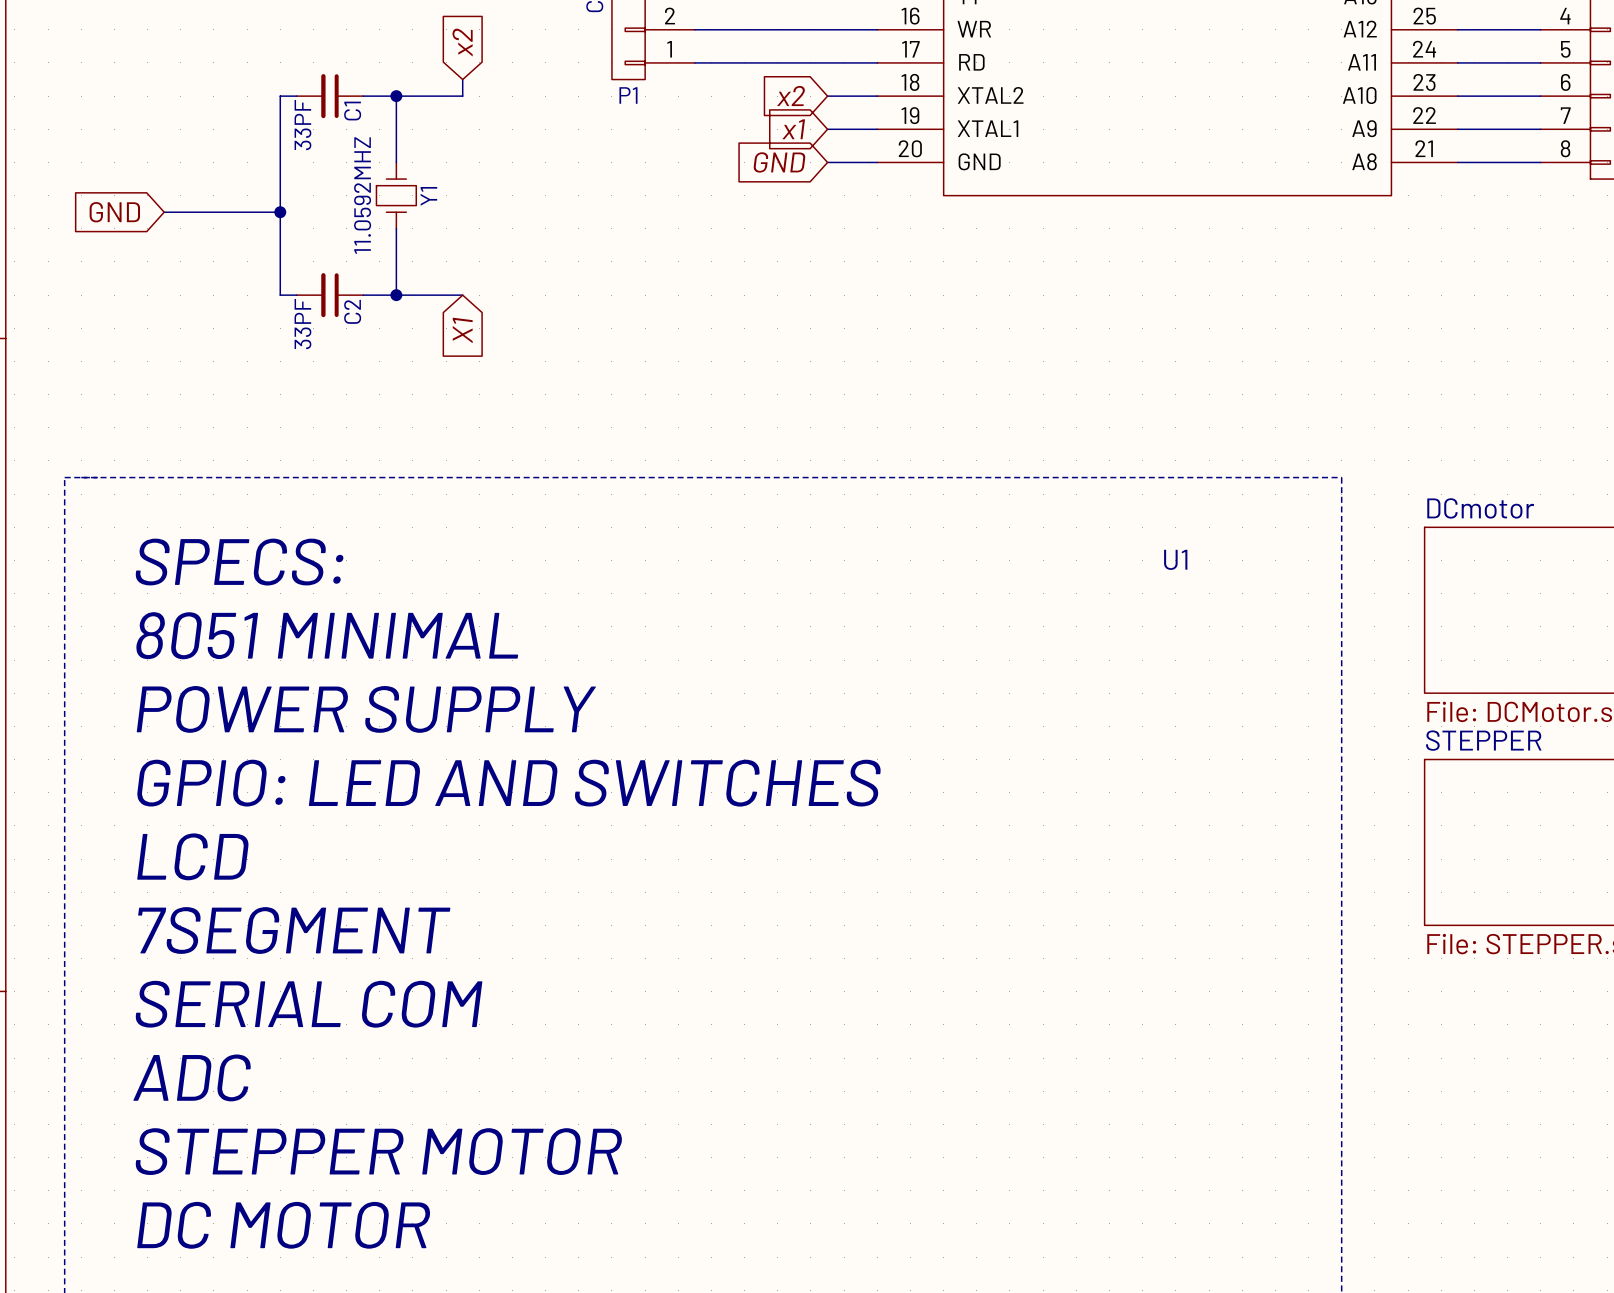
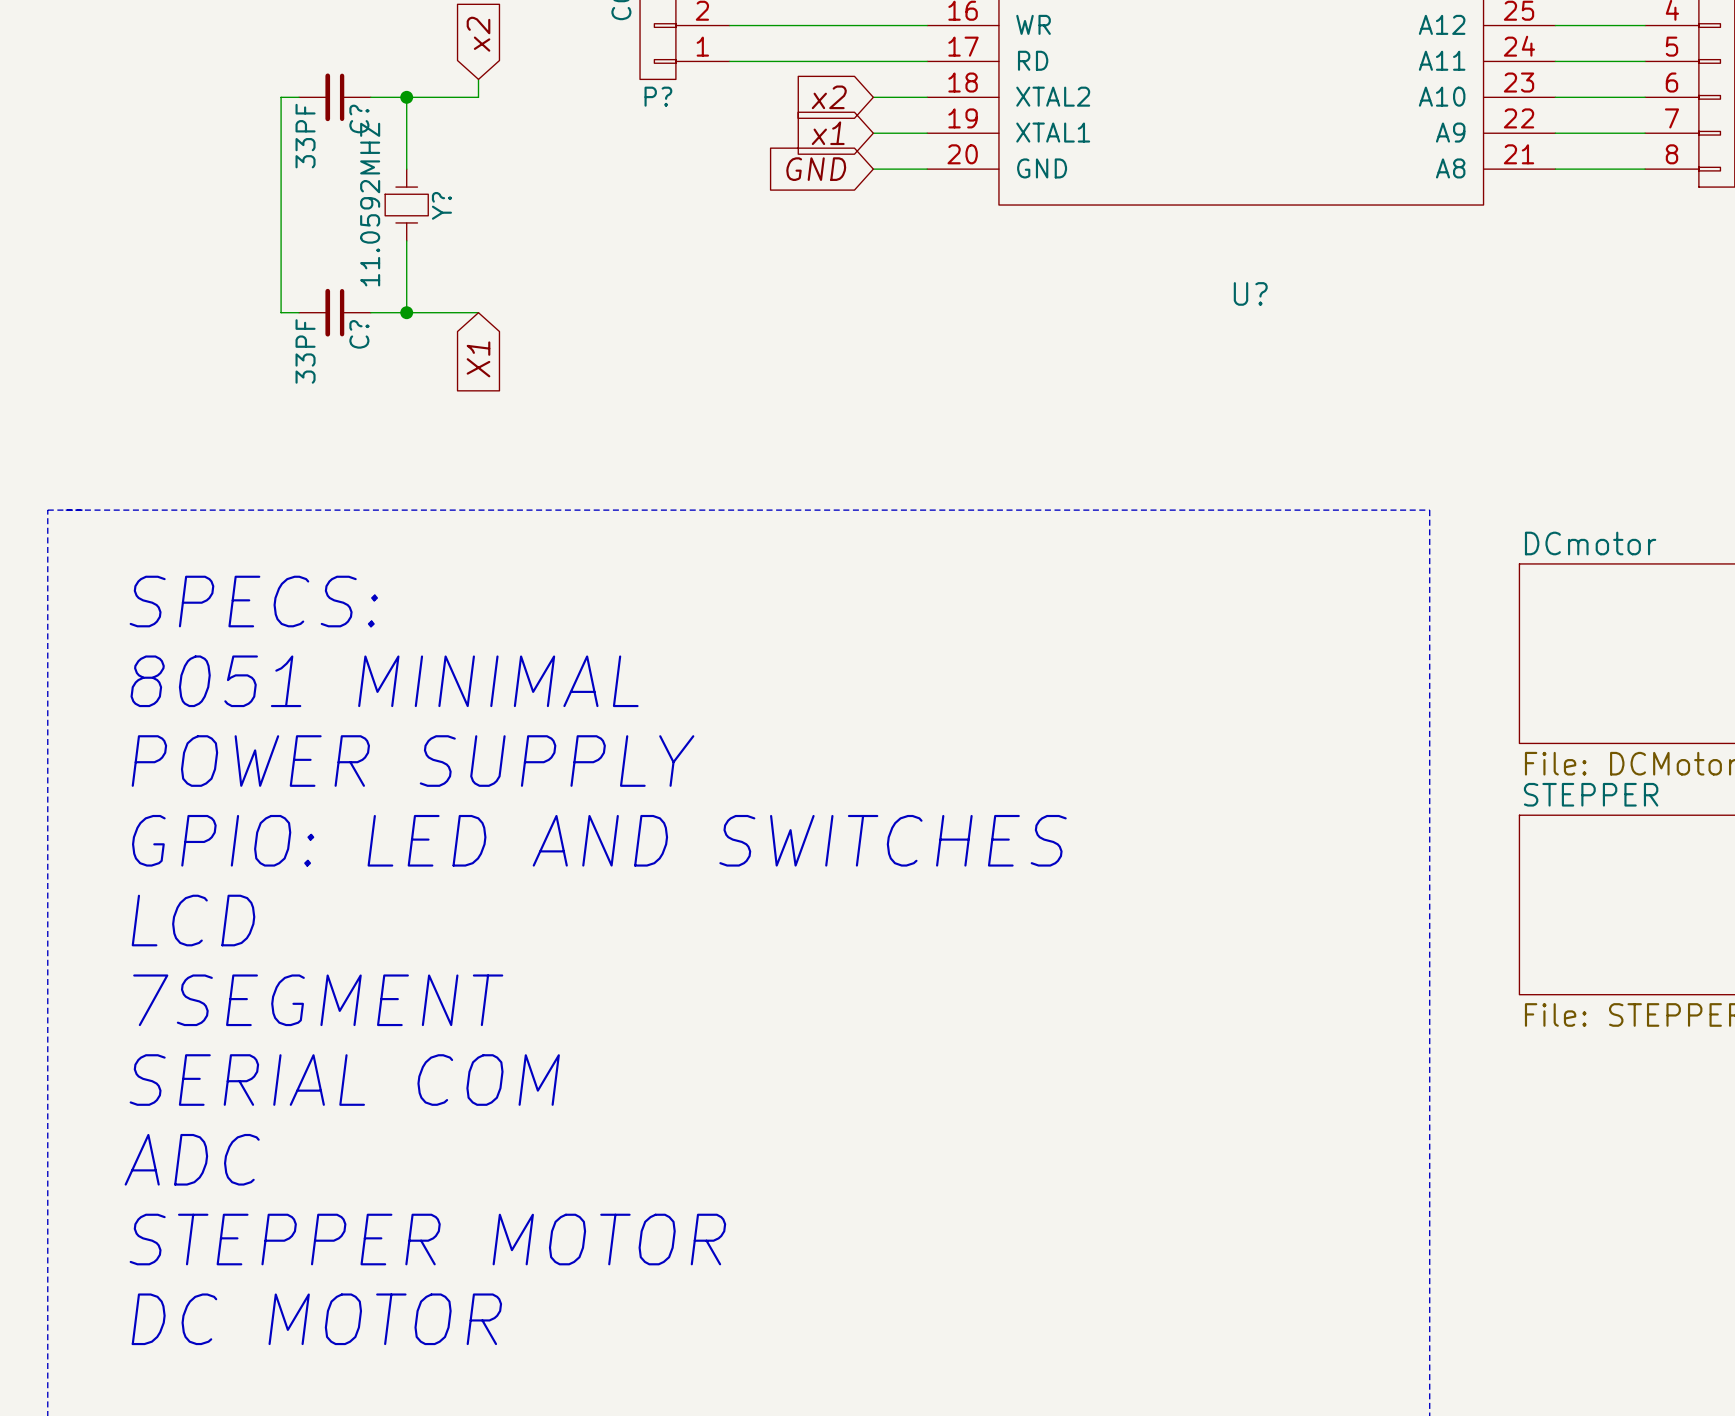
P1 name: P1 (628, 95) -> P? (658, 96)
C1 name: C1 (352, 111) -> C? (359, 119)
Y1 name: Y1 (428, 196) -> Y? (441, 205)
global label: GND (114, 212) -> none
wire: (164, 212) (280, 212) -> none
junction: (280, 212) -> none
C2 name: C2 (352, 311) -> C? (359, 334)
U1 name: U1 (1175, 559) -> U? (1250, 293)

